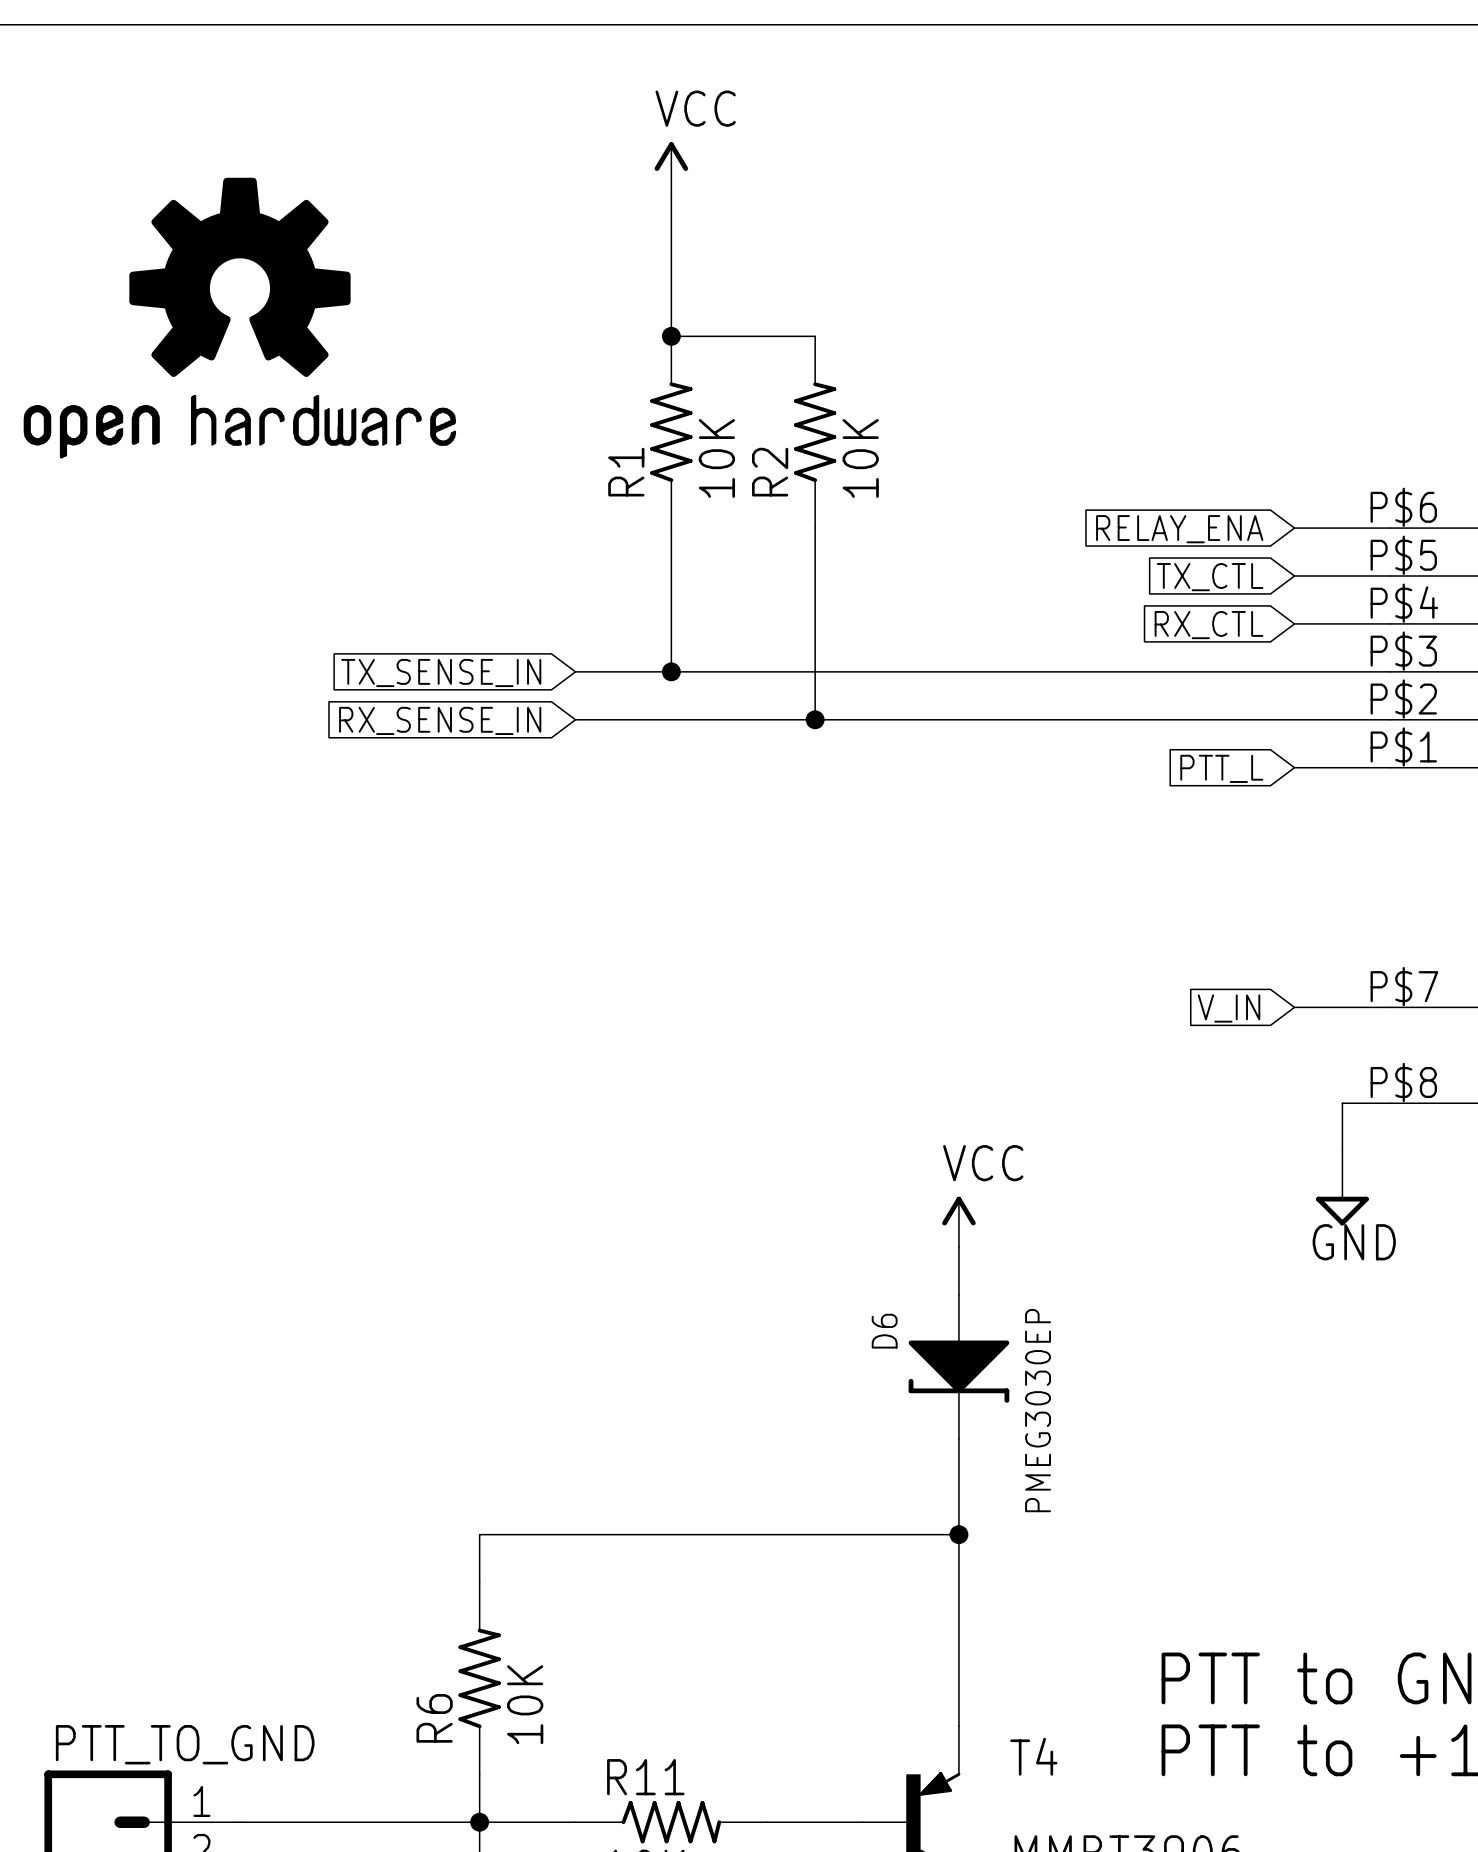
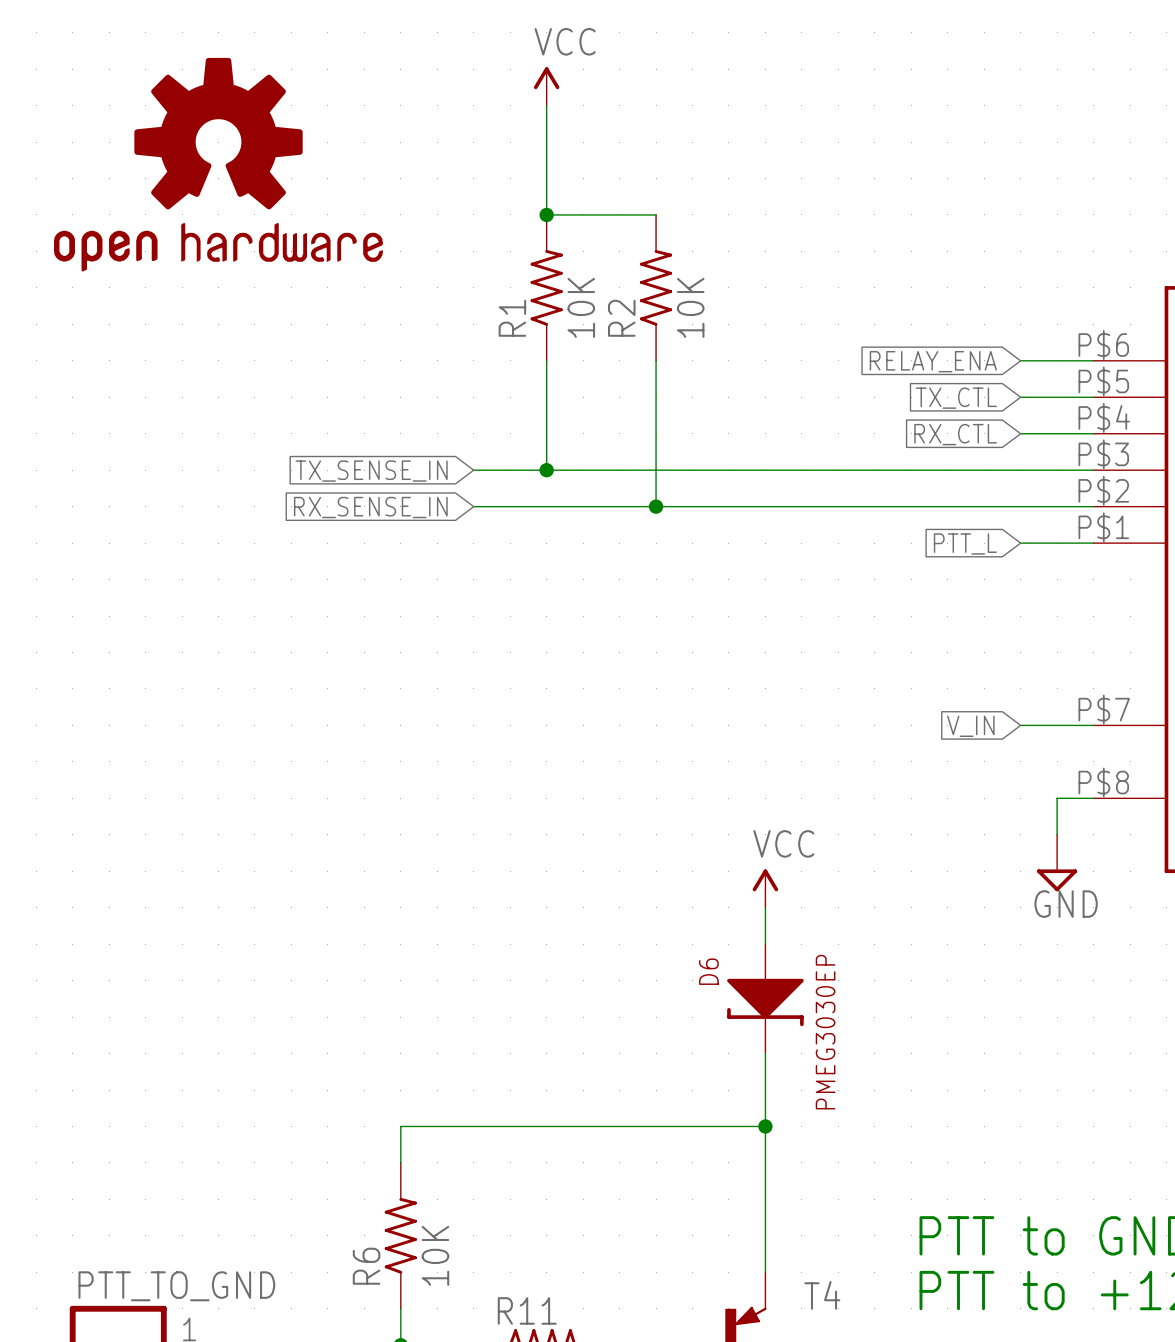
part position: (239, 318) -> (218, 164)

